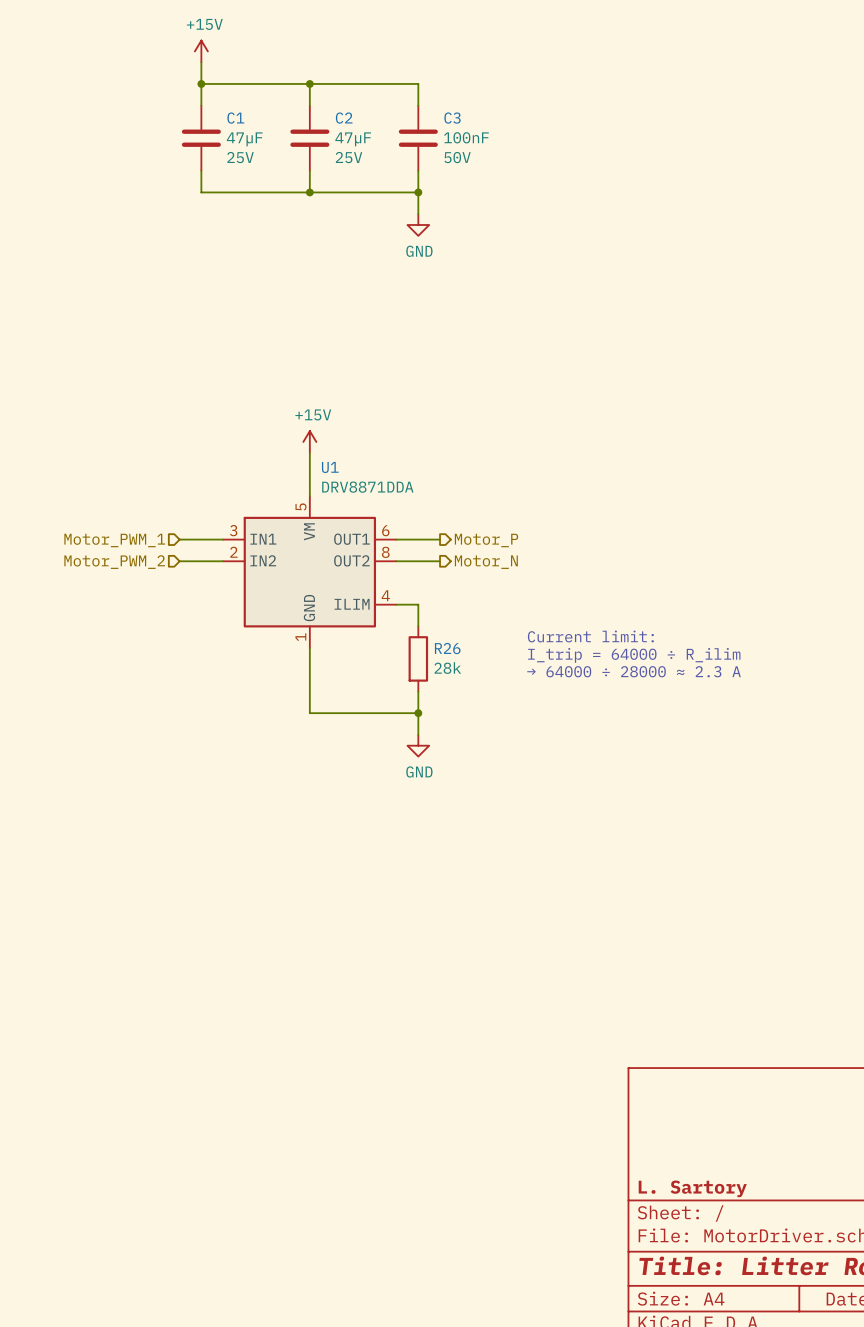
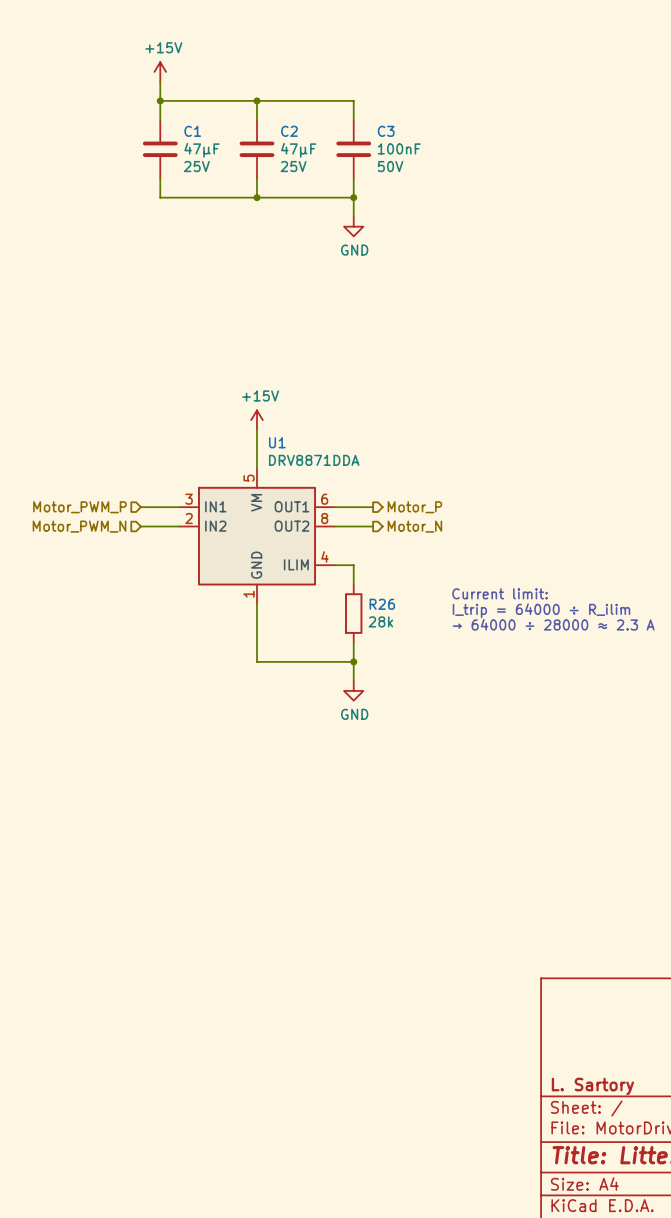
hierarchical label: Motor_PWM_1 (114, 540) -> Motor_PWM_P (79, 507)
hierarchical label: Motor_PWM_2 (114, 562) -> Motor_PWM_N (79, 526)

